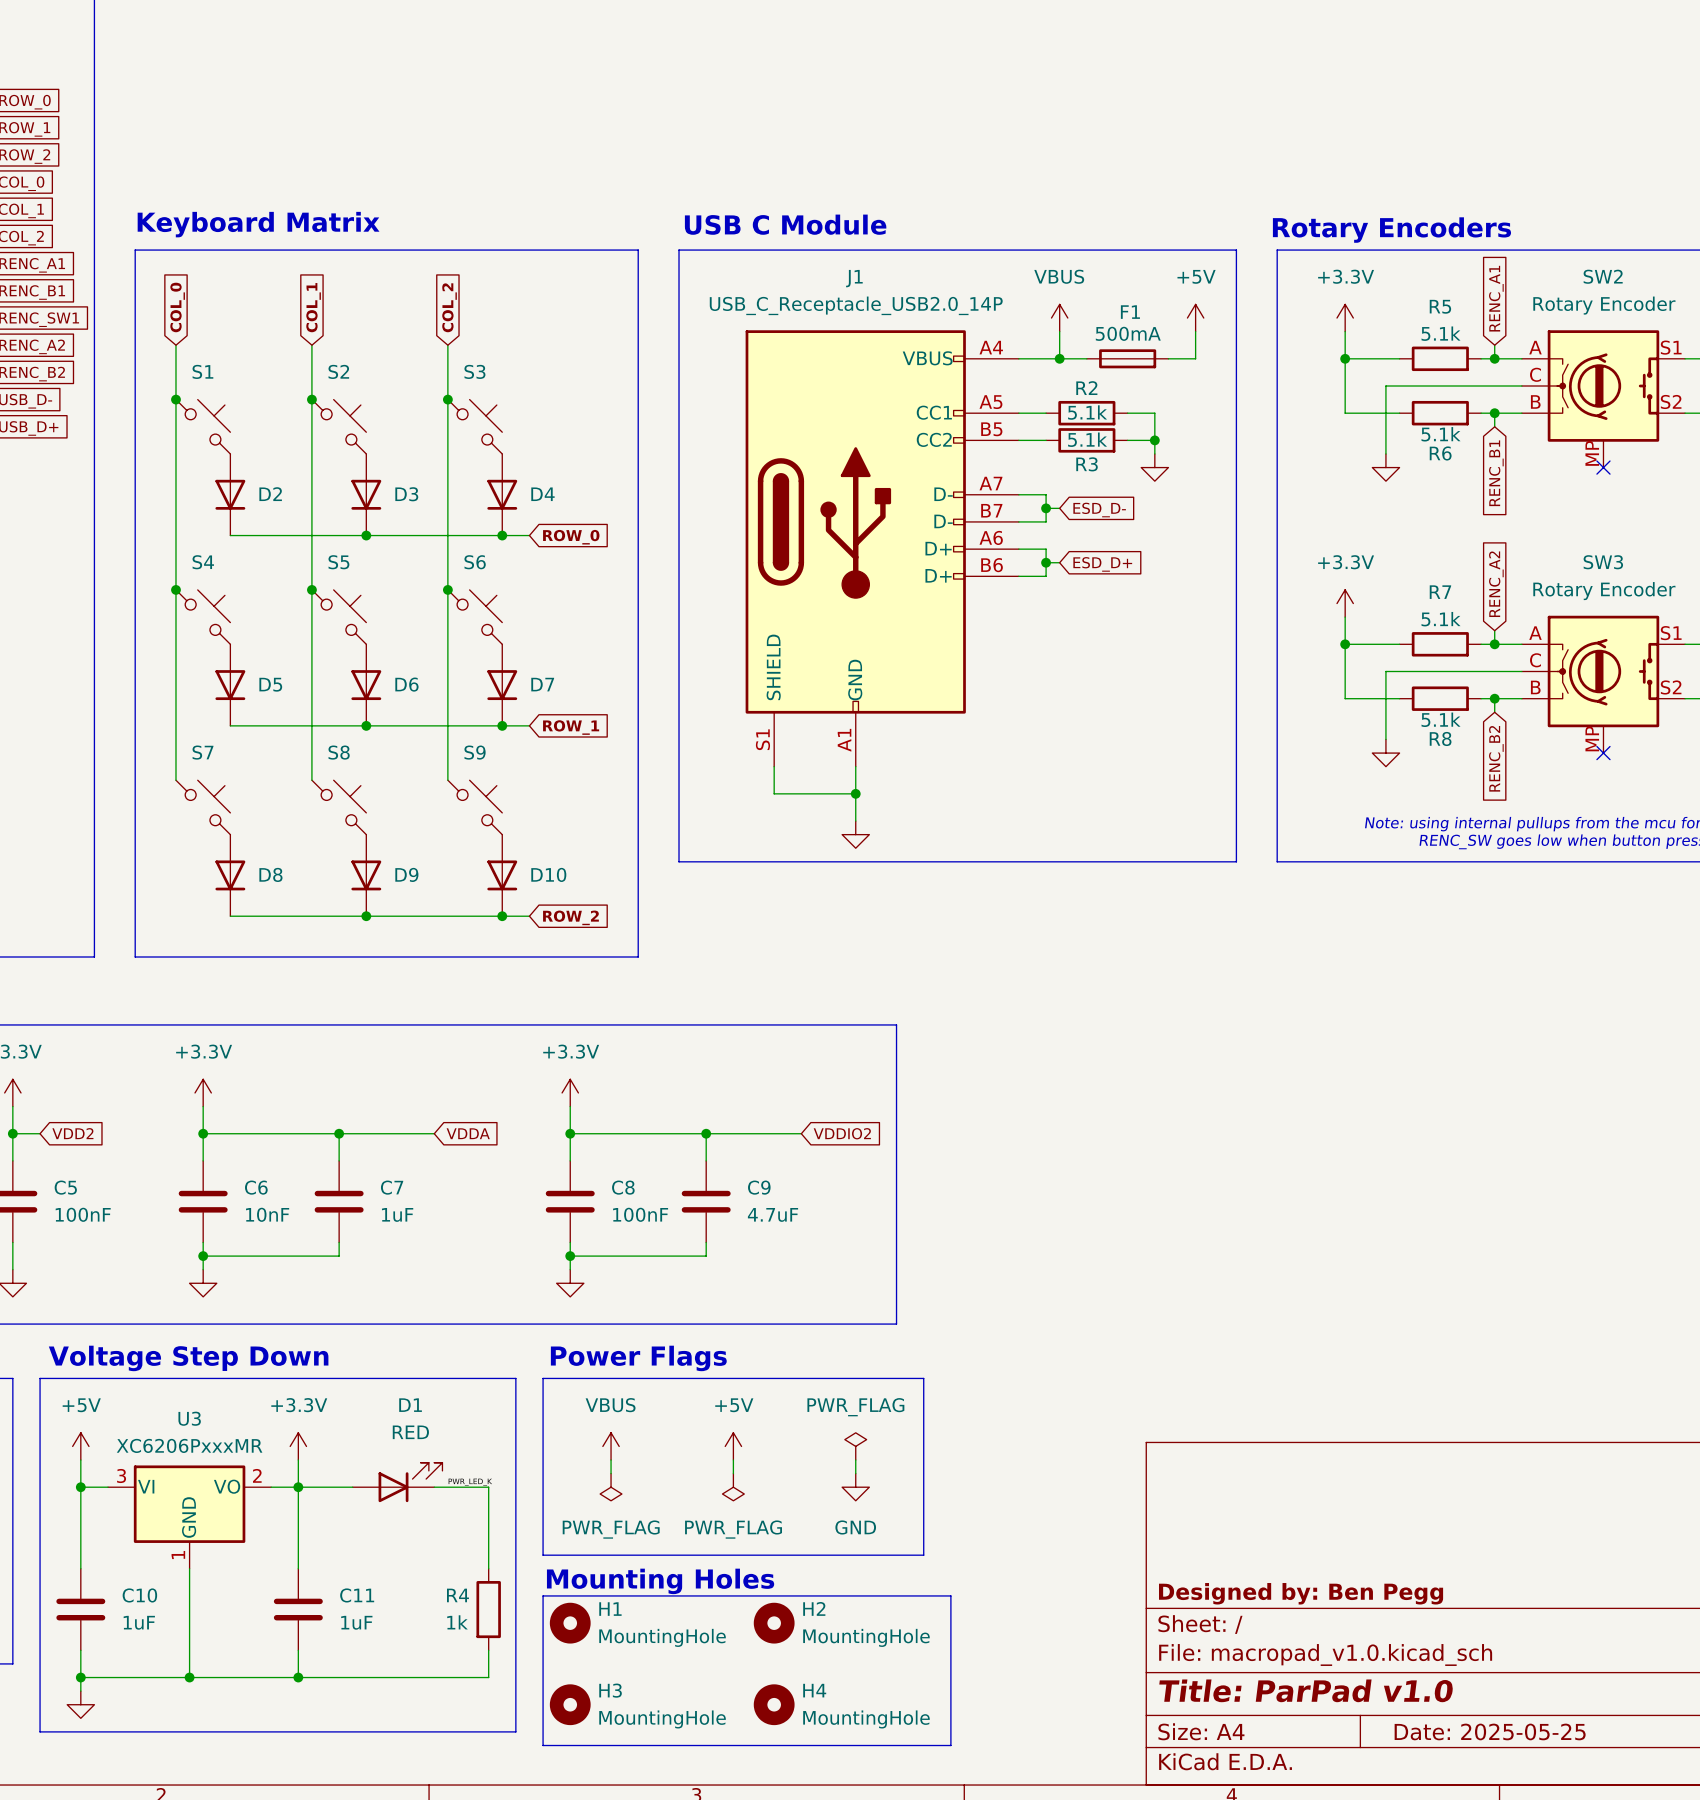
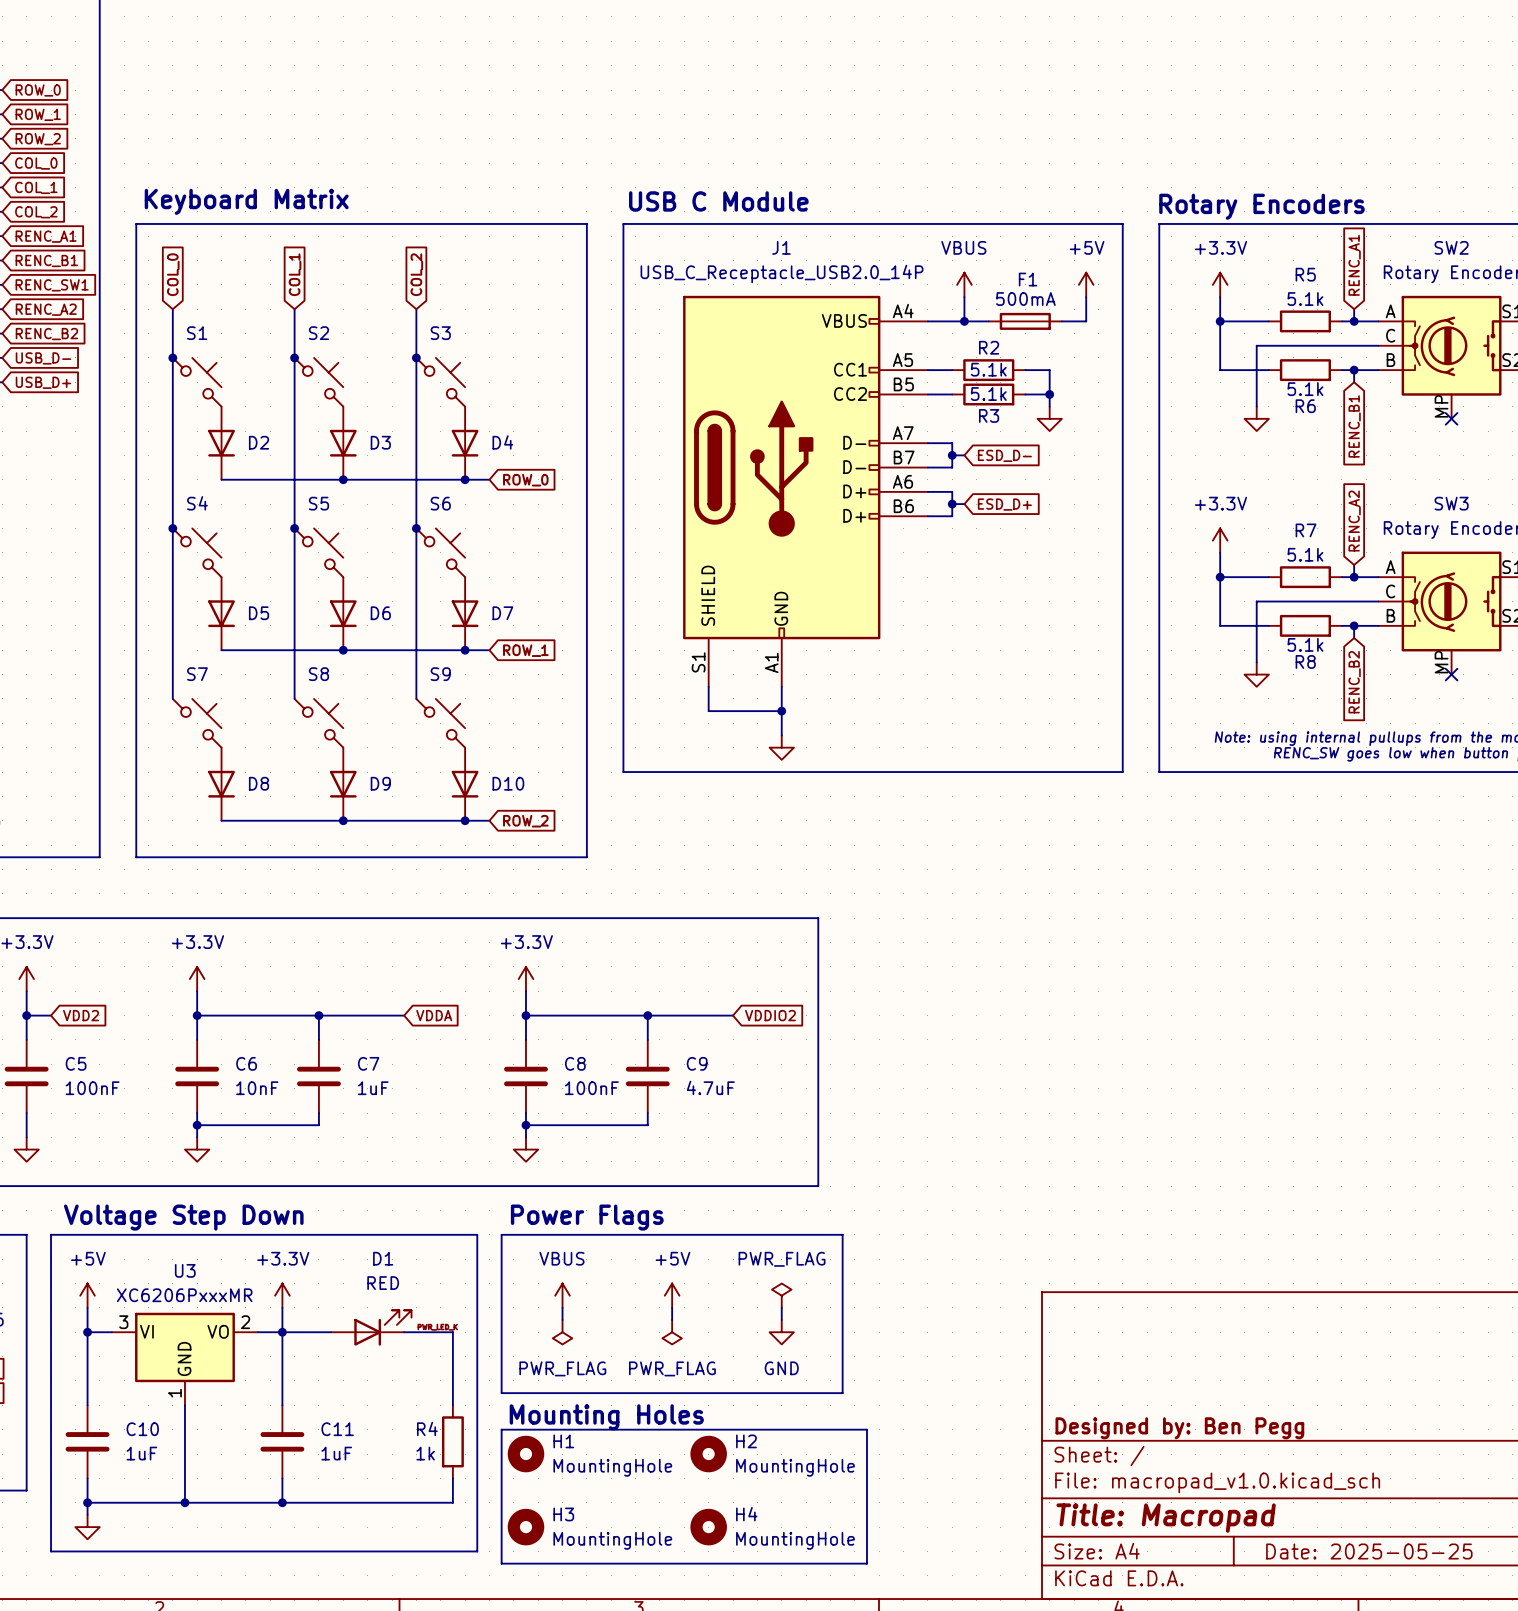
title block: Title: ParPad v1.0 (1306, 1690) -> Title: Macropad (1166, 1518)

